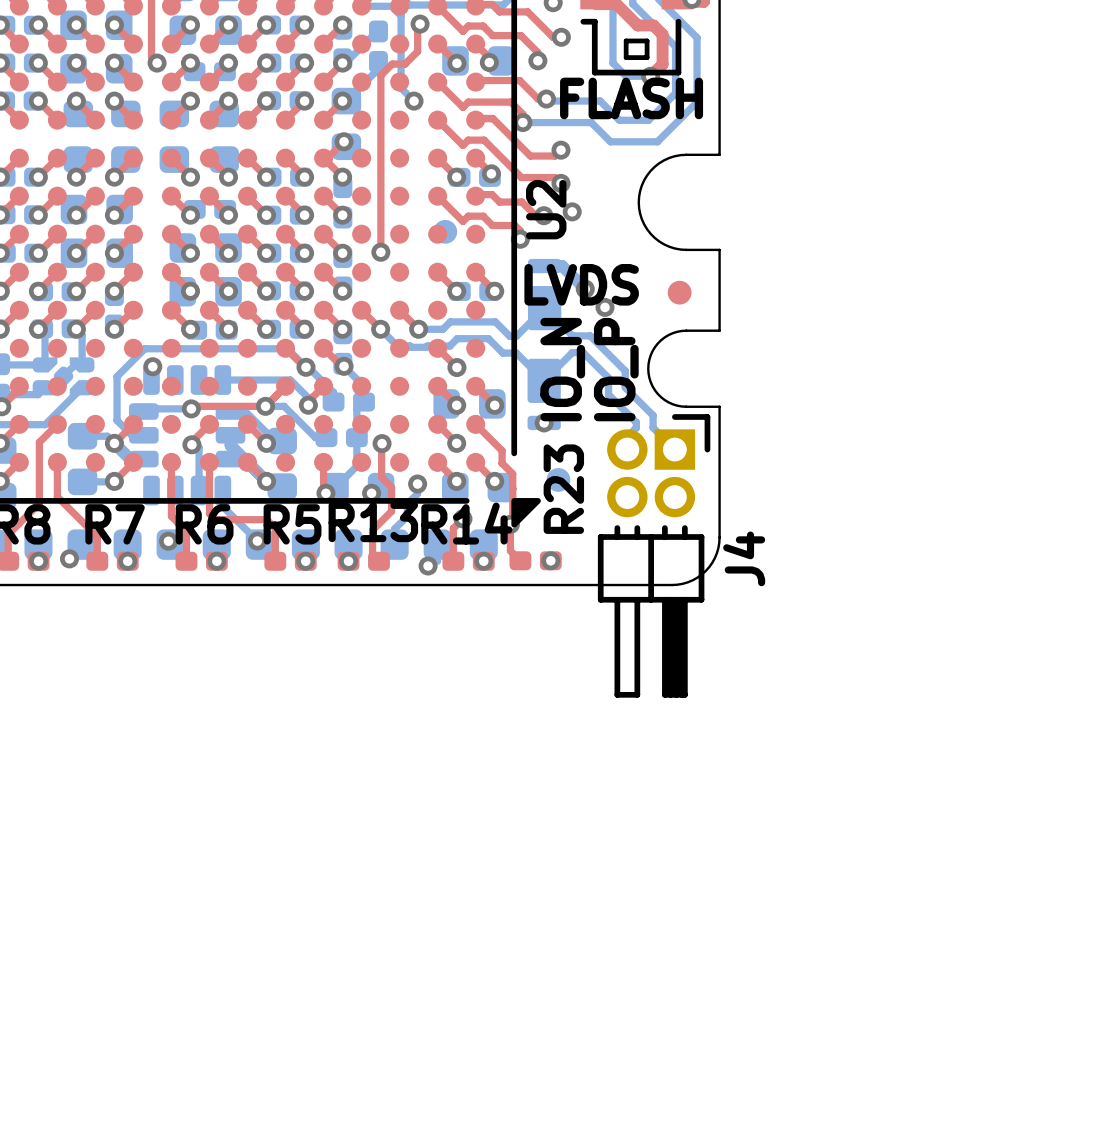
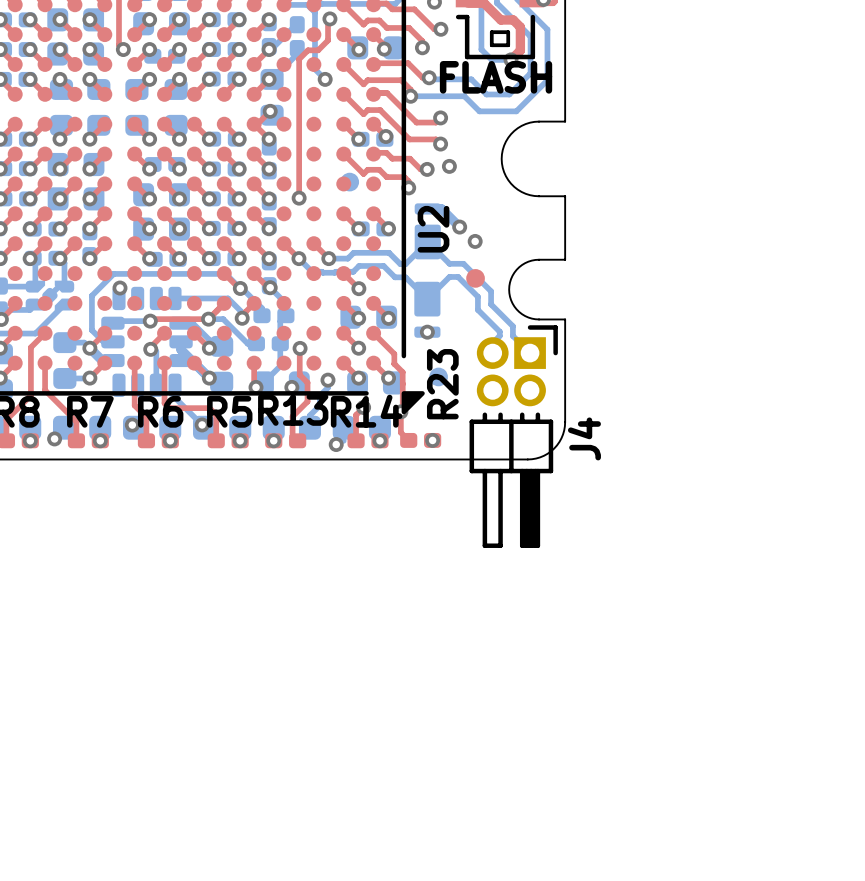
U2 name position: U2 (546, 209) -> U2 (433, 229)
text: LVDS (581, 284) -> none
part position: (679, 292) -> (475, 278)
text: IO_N (562, 369) -> none
text: IO_P (616, 369) -> none

